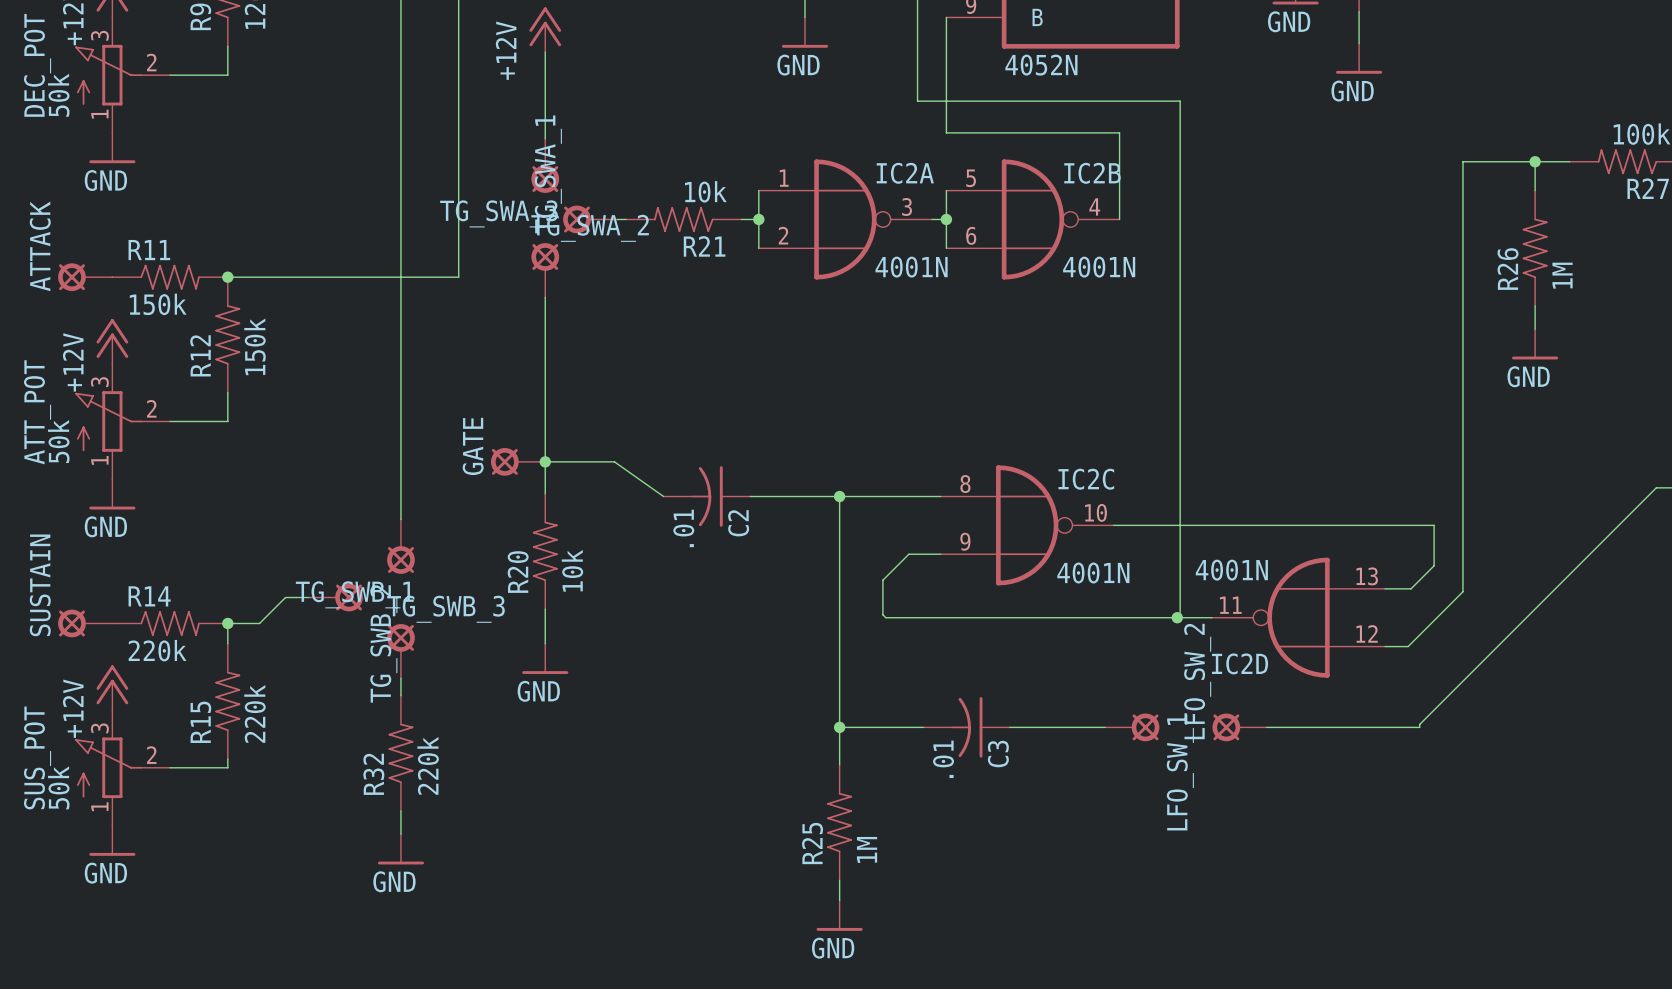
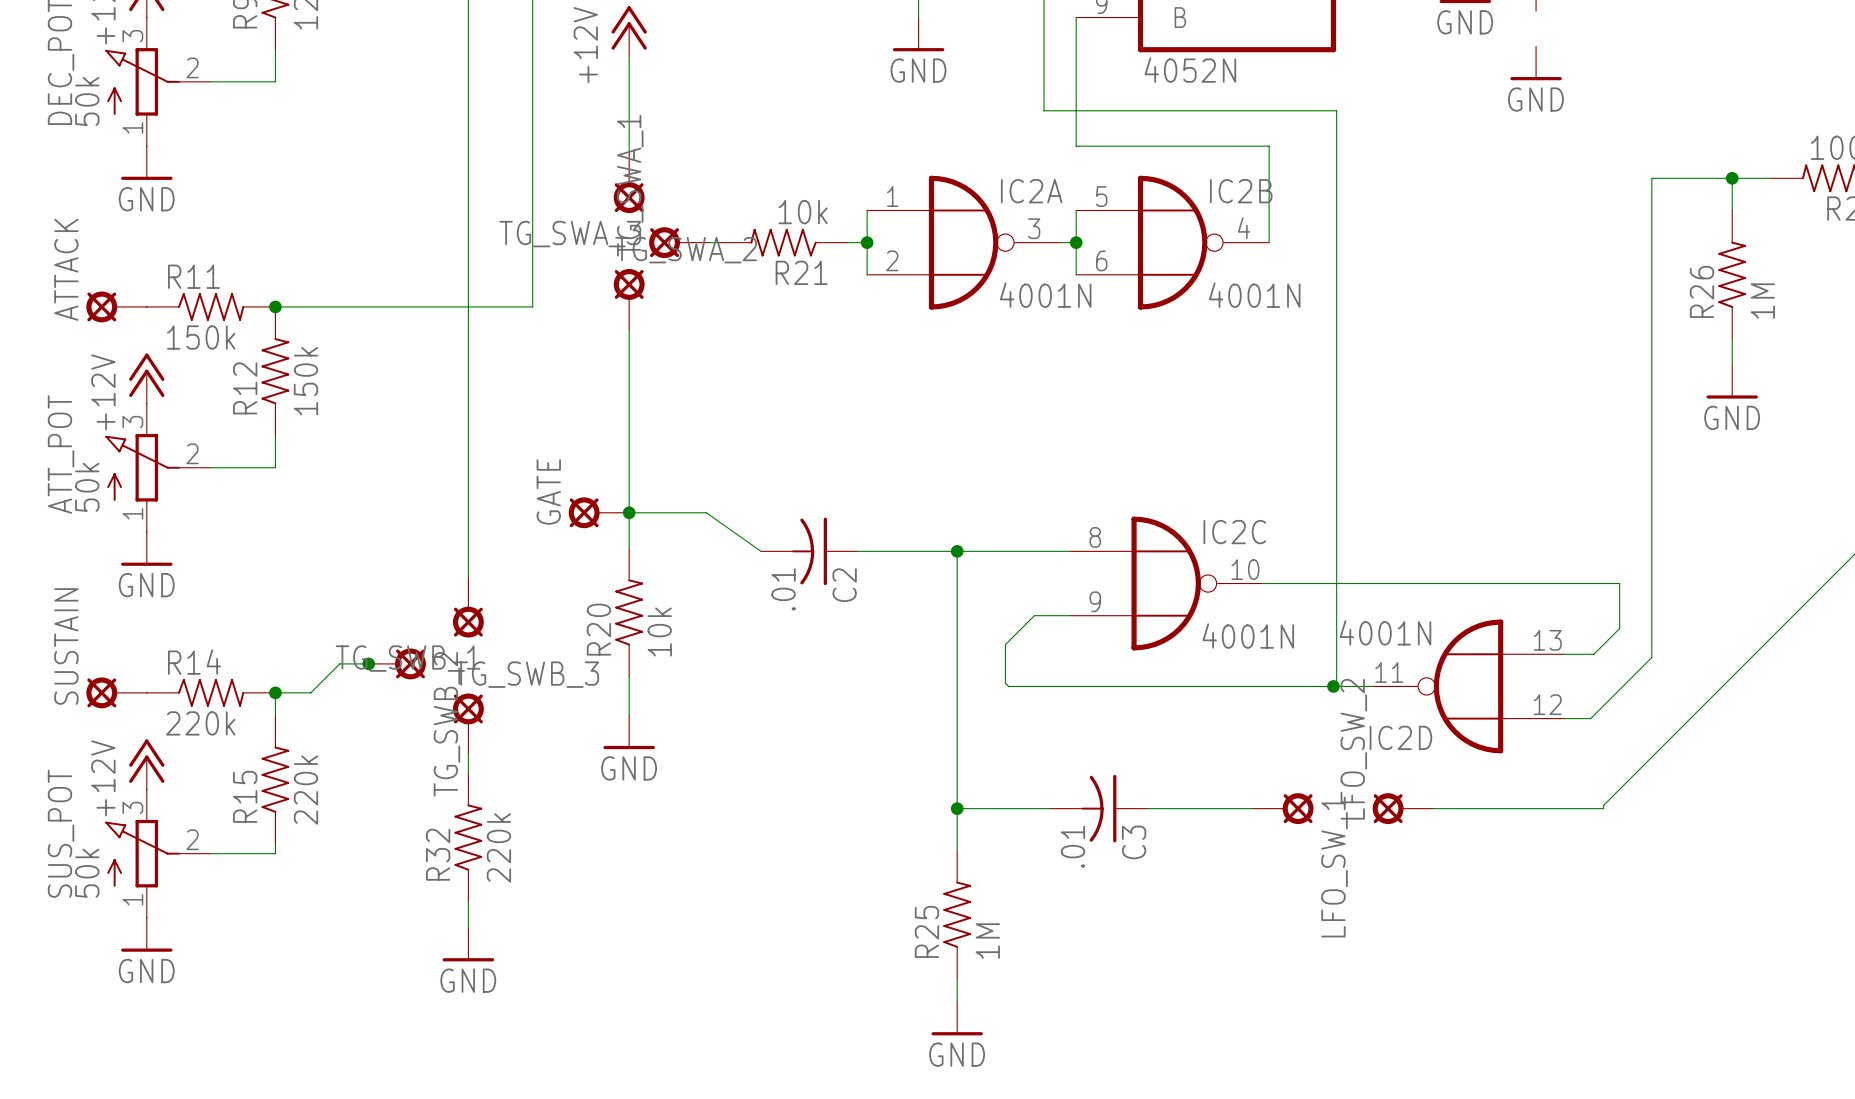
wire: (1359, 11) (1359, 43) -> none
junction: none -> (368, 663)

